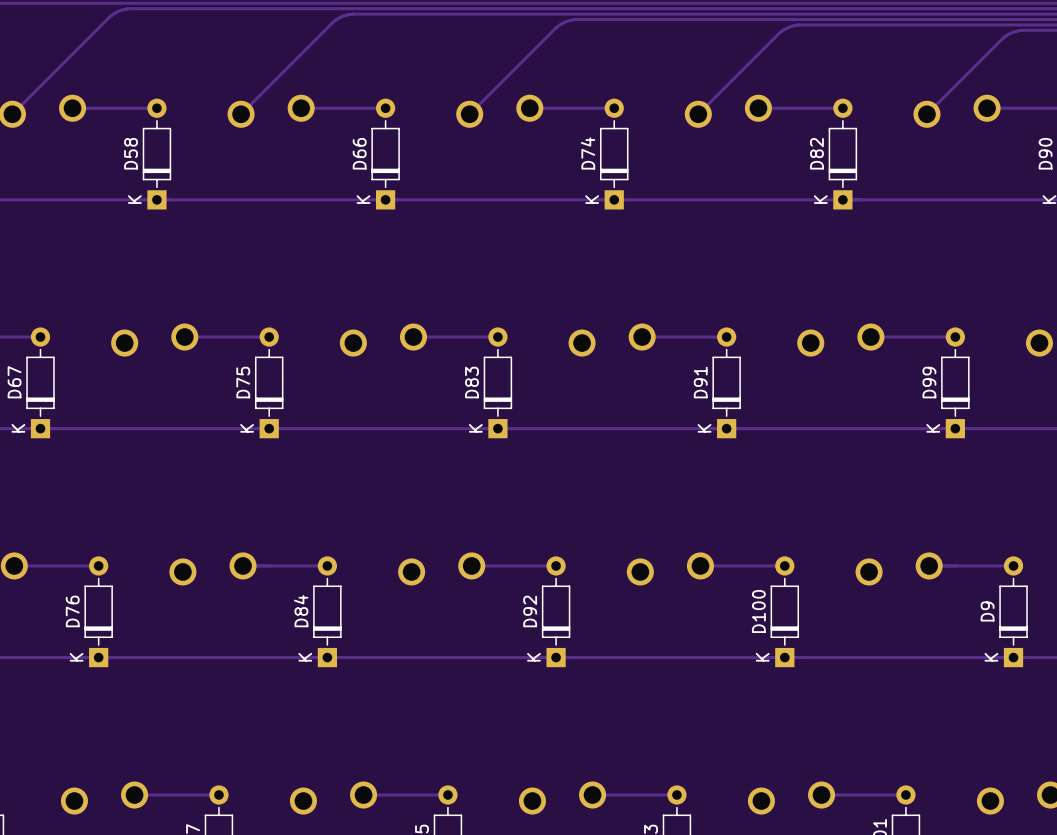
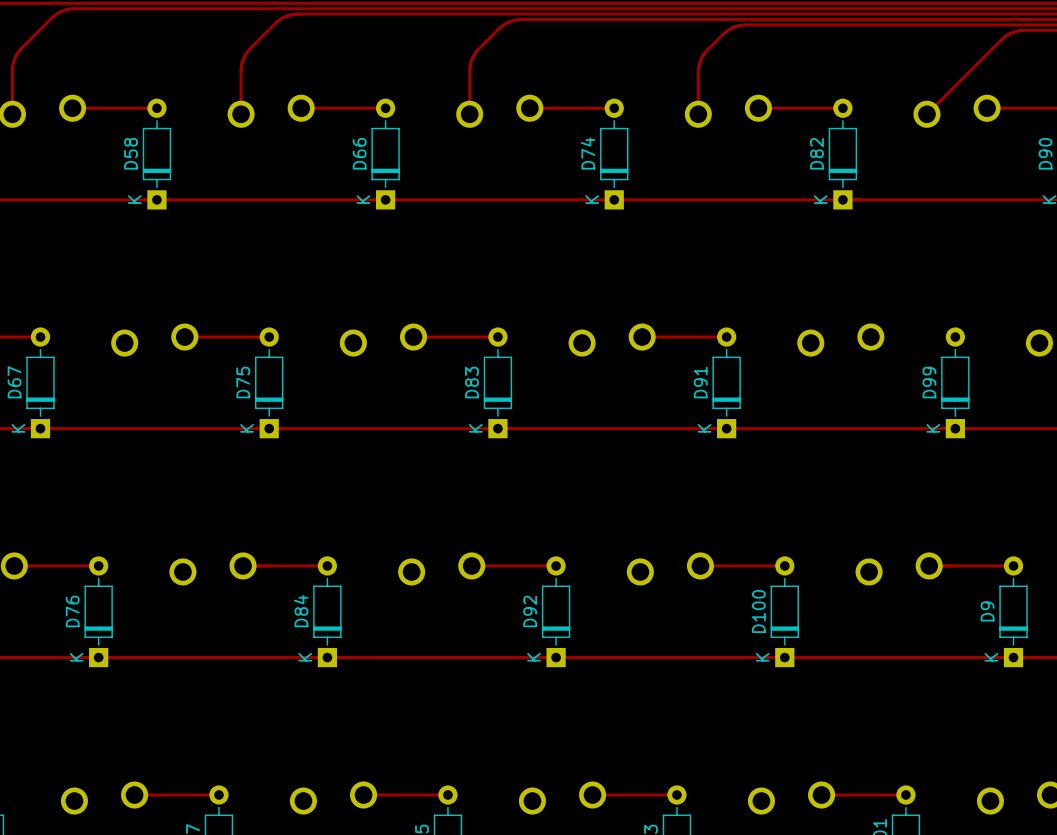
track: (129, 8) (120, 10) (109, 17) (12, 114) -> (129, 8) (69, 9) (52, 17) (20, 49) (15, 57) (12, 69) (12, 114)
track: (353, 14) (340, 17) (332, 22) (241, 114) -> (353, 14) (293, 14) (276, 22) (249, 49) (242, 60) (241, 69) (241, 114)
track: (576, 19) (566, 21) (555, 27) (469, 114) -> (576, 19) (517, 19) (499, 27) (478, 49) (471, 60) (469, 70) (469, 114)
track: (799, 24) (790, 26) (779, 33) (698, 114) -> (799, 24) (741, 25) (724, 33) (706, 50) (700, 61) (698, 71) (698, 114)
track: (870, 337) (955, 337) -> none

